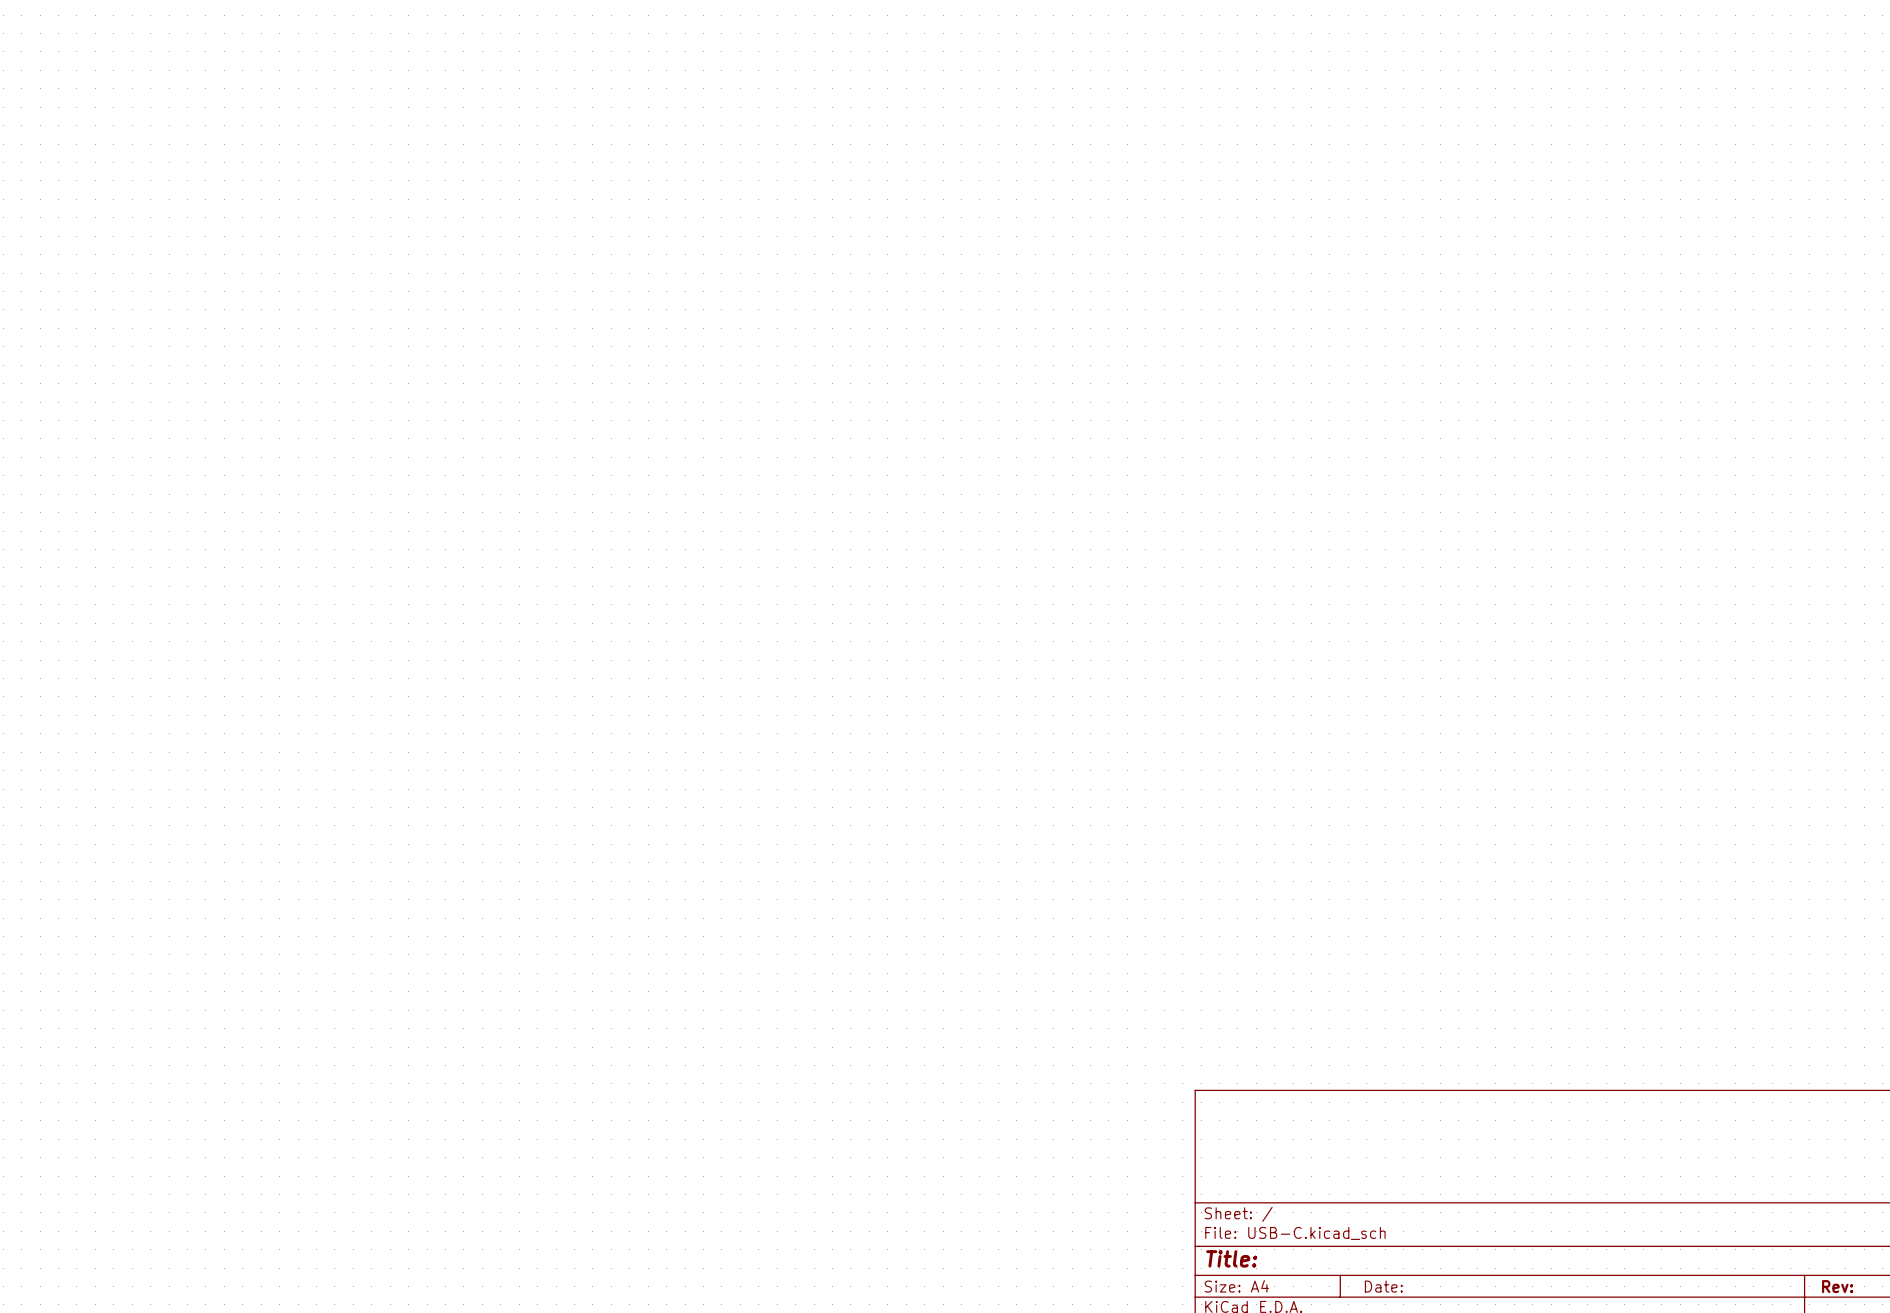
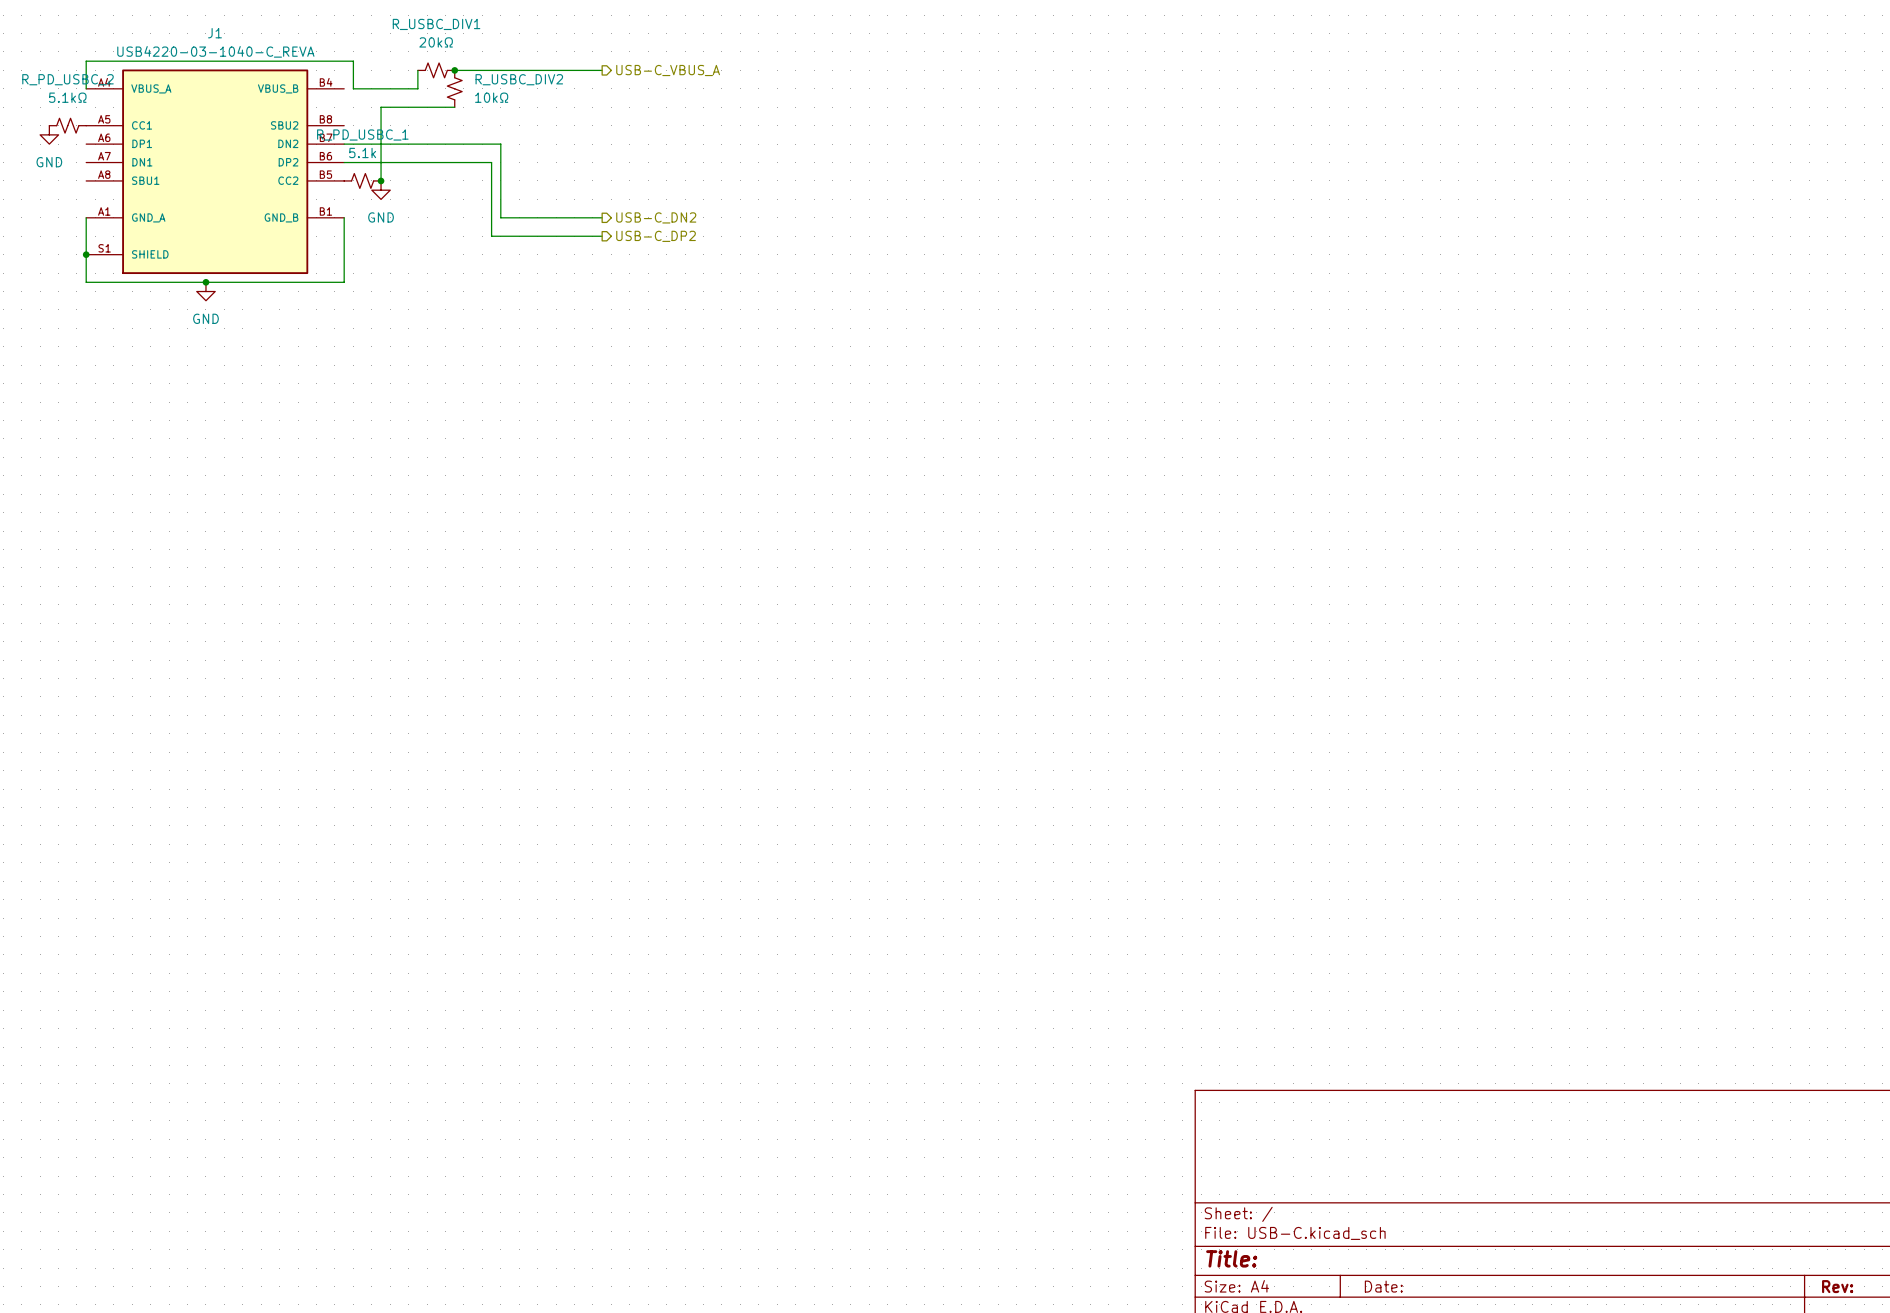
wire: none -> (417, 70) (417, 88) (353, 88) (353, 61) (86, 61) (86, 88)
R_USBC_DIV1: none -> 20kΩ (436, 70)
wire: none -> (454, 70) (602, 70)
junction: none -> (454, 70)
hierarchical label: none -> USB-C_VBUS_A (668, 70)
R_USBC_DIV2: none -> 10kΩ (454, 88)
wire: none -> (454, 107) (381, 107) (381, 180)
R_PD_USBC_2: none -> 5.1kΩ (67, 125)
power symbol: none -> GND (49, 134)
wire: none -> (344, 144) (500, 144) (500, 217) (602, 217)
wire: none -> (344, 162) (491, 162) (491, 236) (602, 236)
J1: none -> USB4220-03-1040-C_REVA (215, 171)
R_PD_USBC_1: none -> 5.1k (362, 180)
junction: none -> (381, 180)
power symbol: none -> GND (381, 190)
wire: none -> (86, 217) (86, 282) (344, 282) (344, 217)
hierarchical label: none -> USB-C_DN2 (656, 217)
hierarchical label: none -> USB-C_DP2 (656, 236)
junction: none -> (86, 254)
junction: none -> (205, 282)
power symbol: none -> GND (205, 291)

